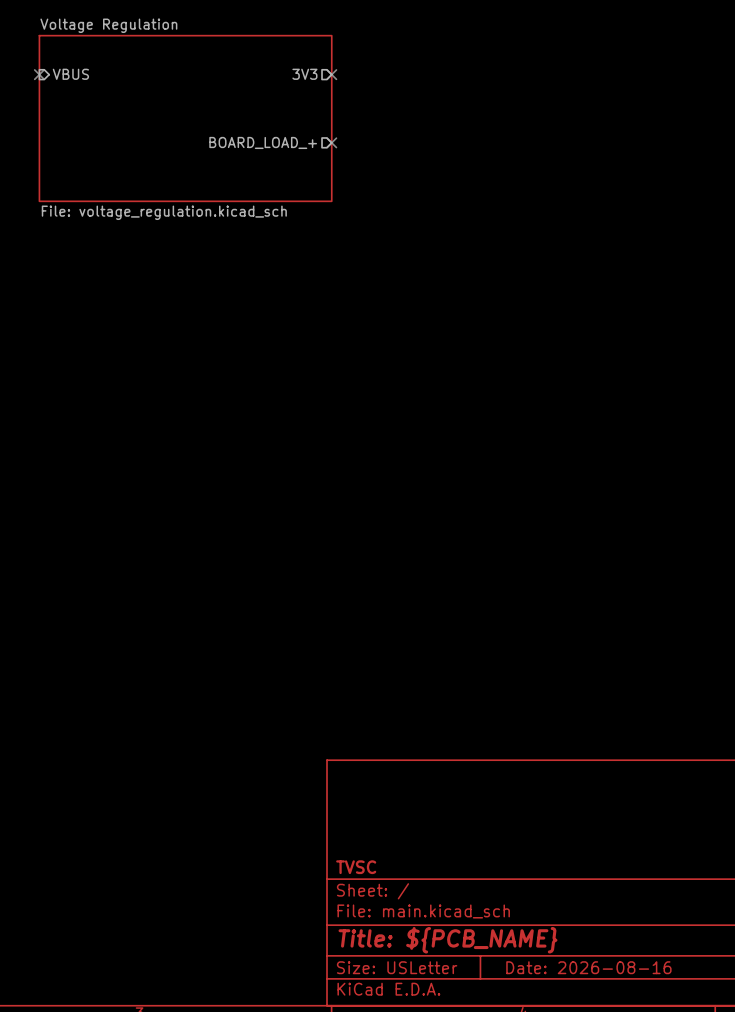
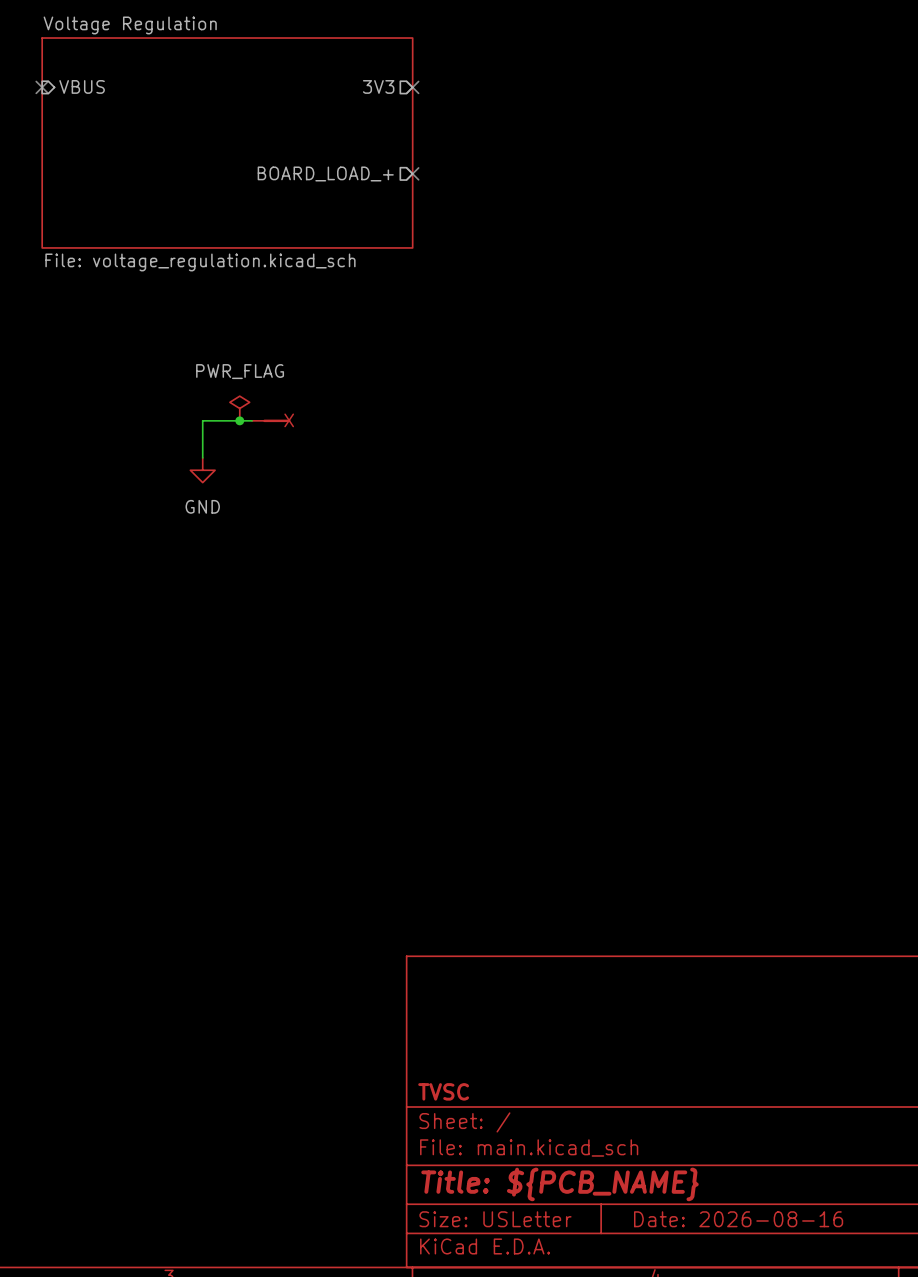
power symbol: none -> PWR_FLAG (239, 408)
junction: none -> (239, 420)
wire: none -> (252, 420) (202, 420) (202, 457)
part: none -> (271, 420)
power symbol: none -> GND (202, 470)

